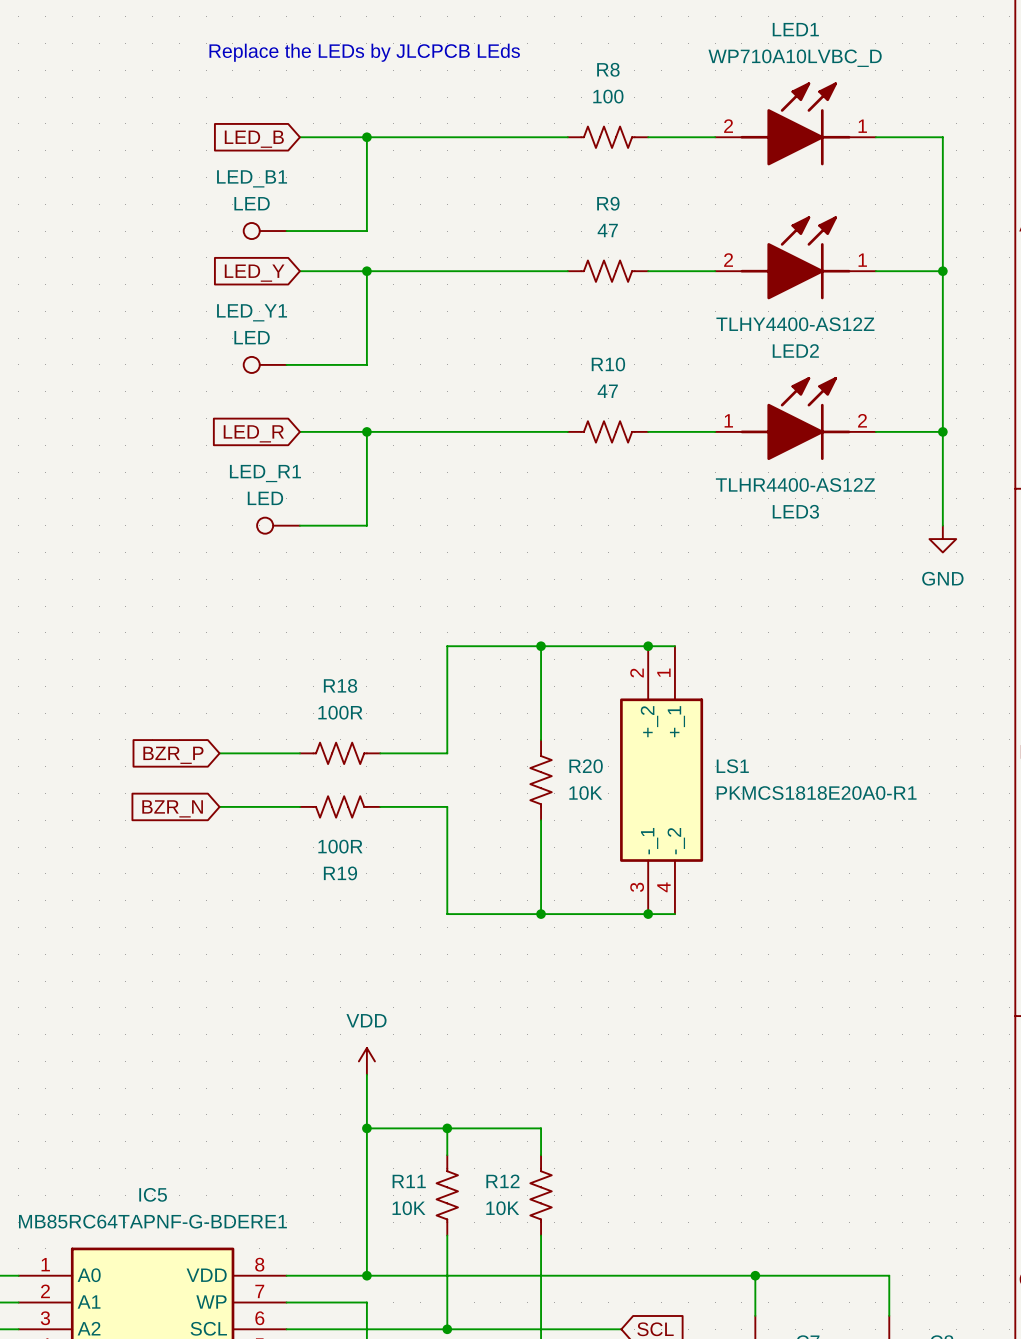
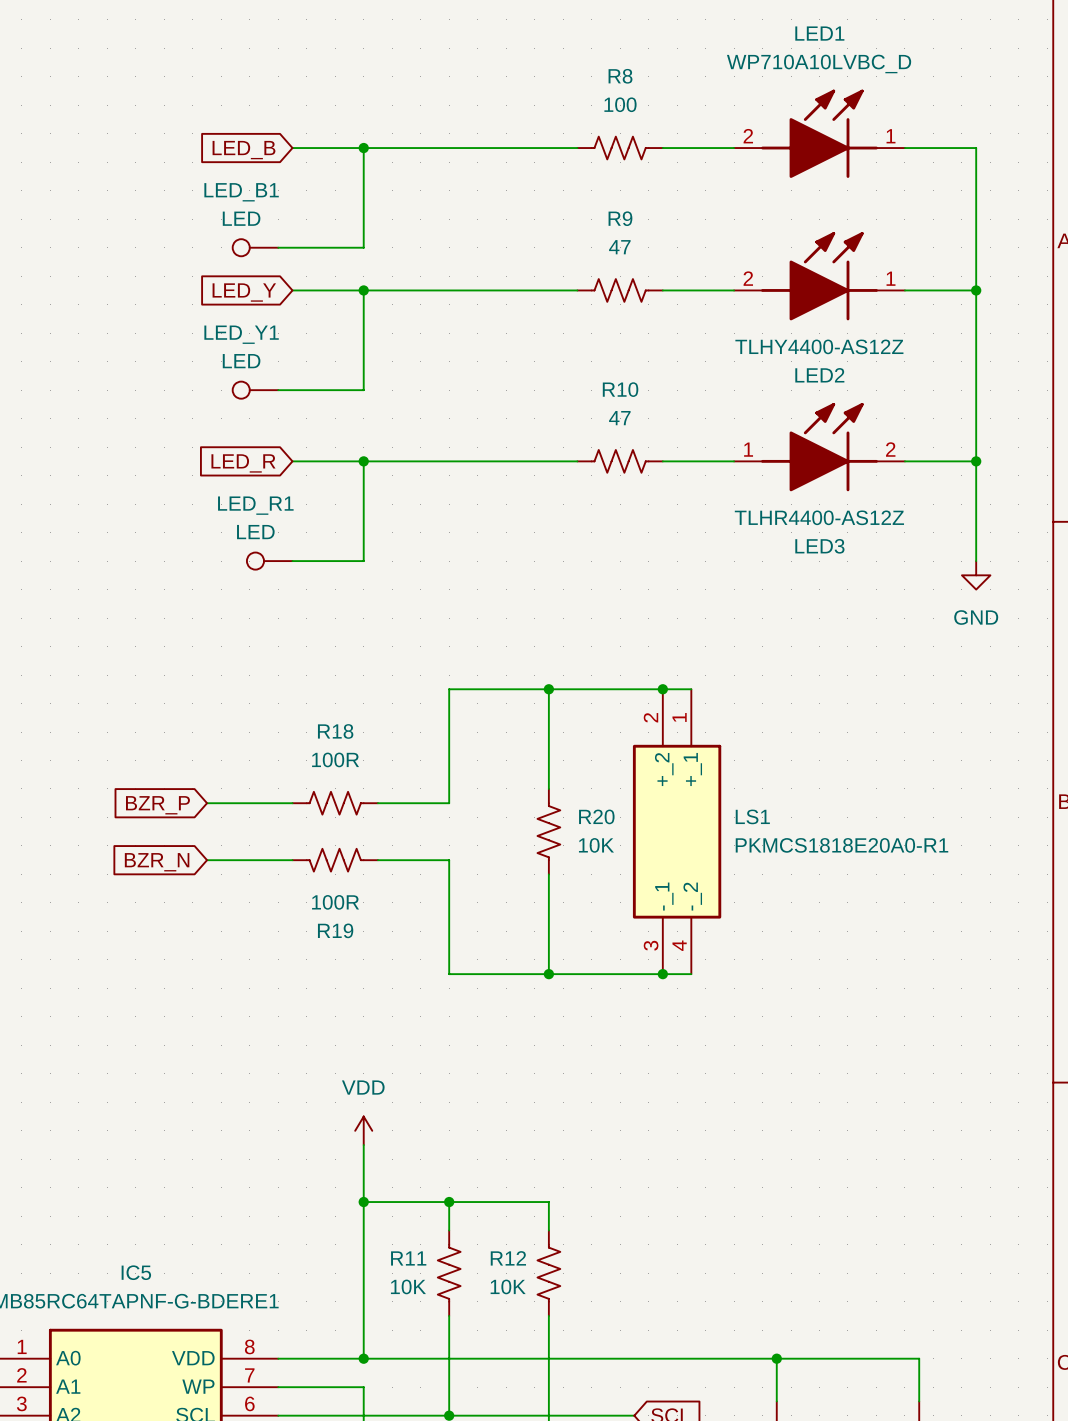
text: Replace the LEDs by JLCPCB LEds (364, 52) -> none

